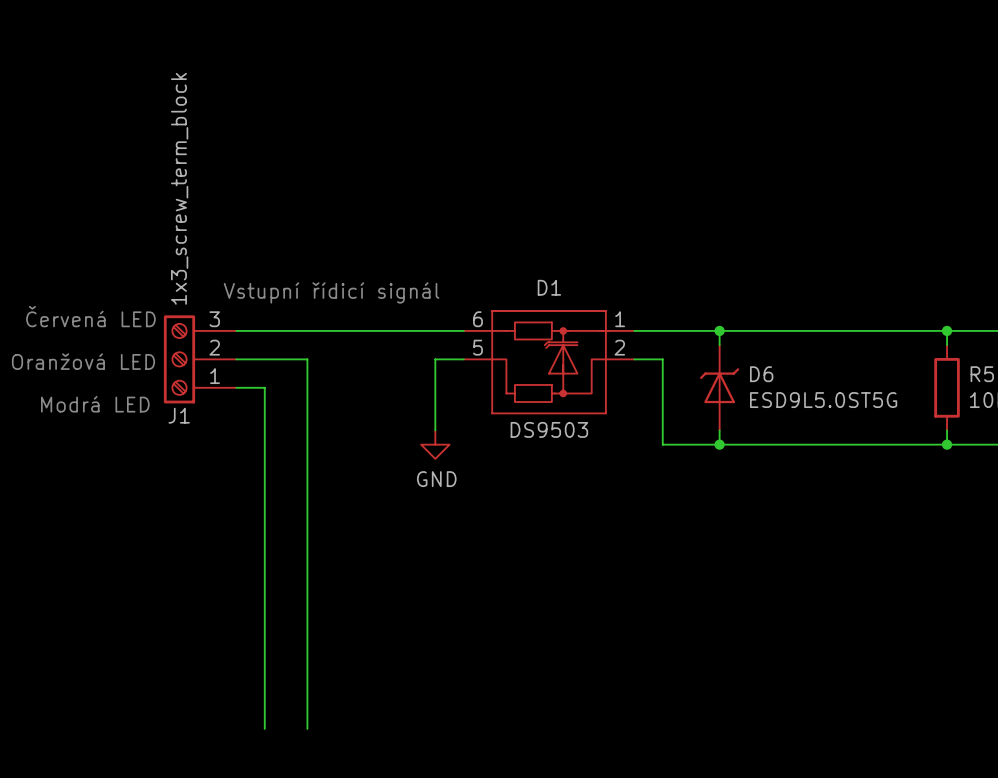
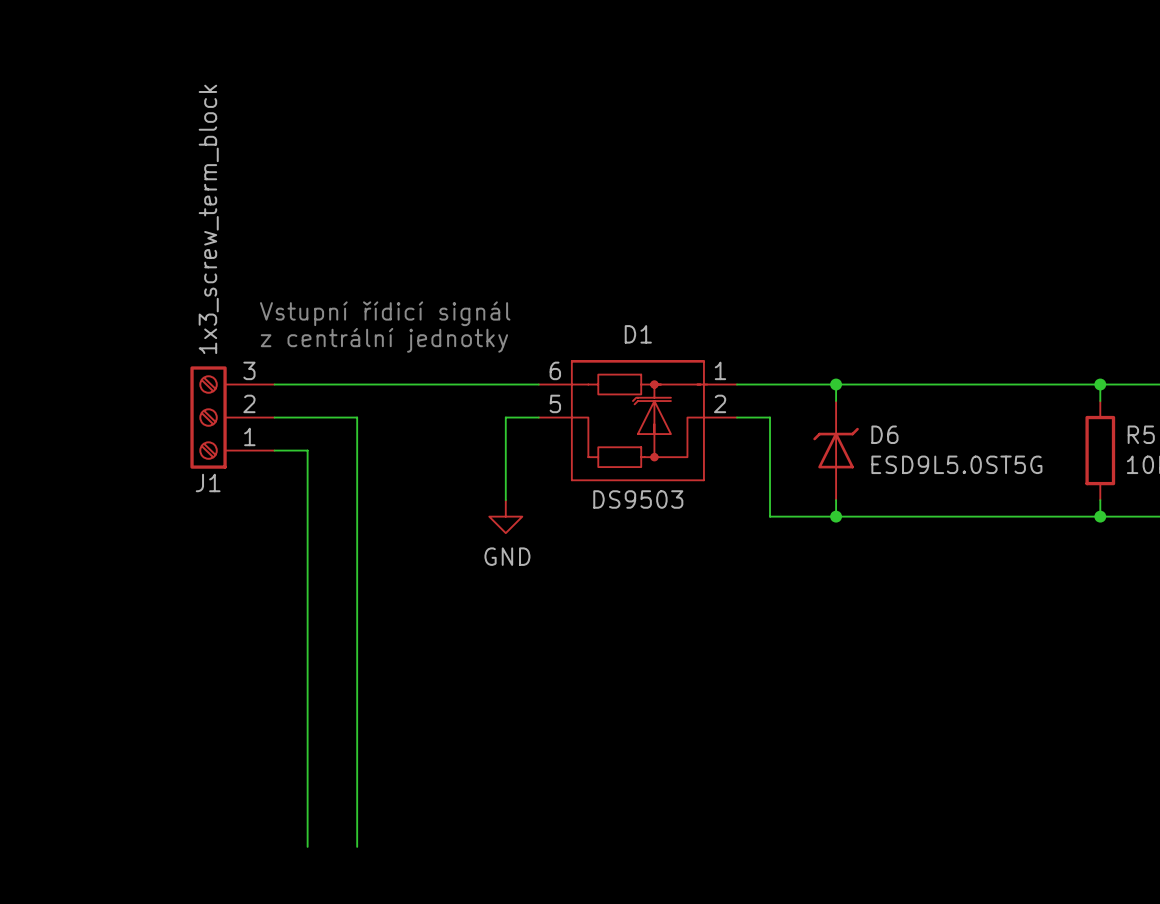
text: none -> Vstupní řídicí signál (385, 313)
text: Vstupní řídicí signál (331, 292) -> z centrální jednotky (384, 340)
text: Červená LED (90, 316) -> none
text: Oranžová LED (83, 361) -> none
text: Modrá LED (95, 404) -> none

